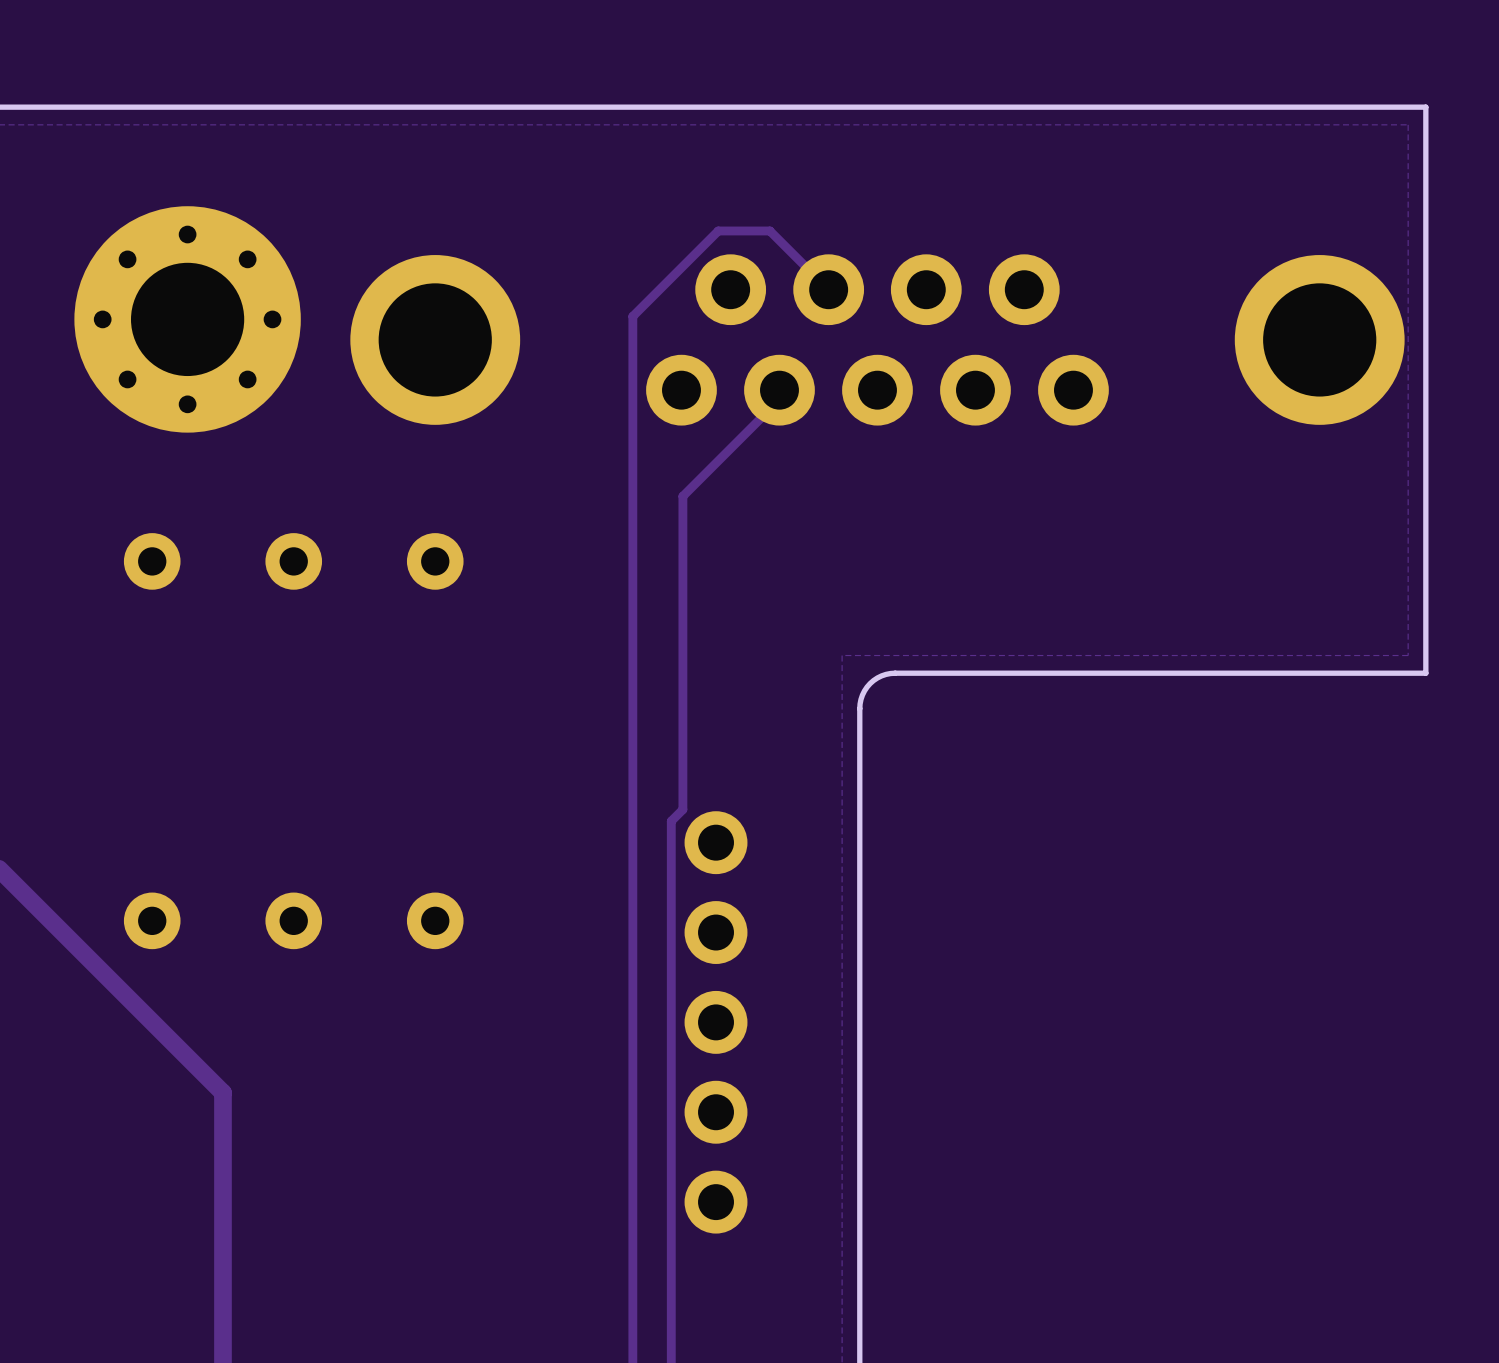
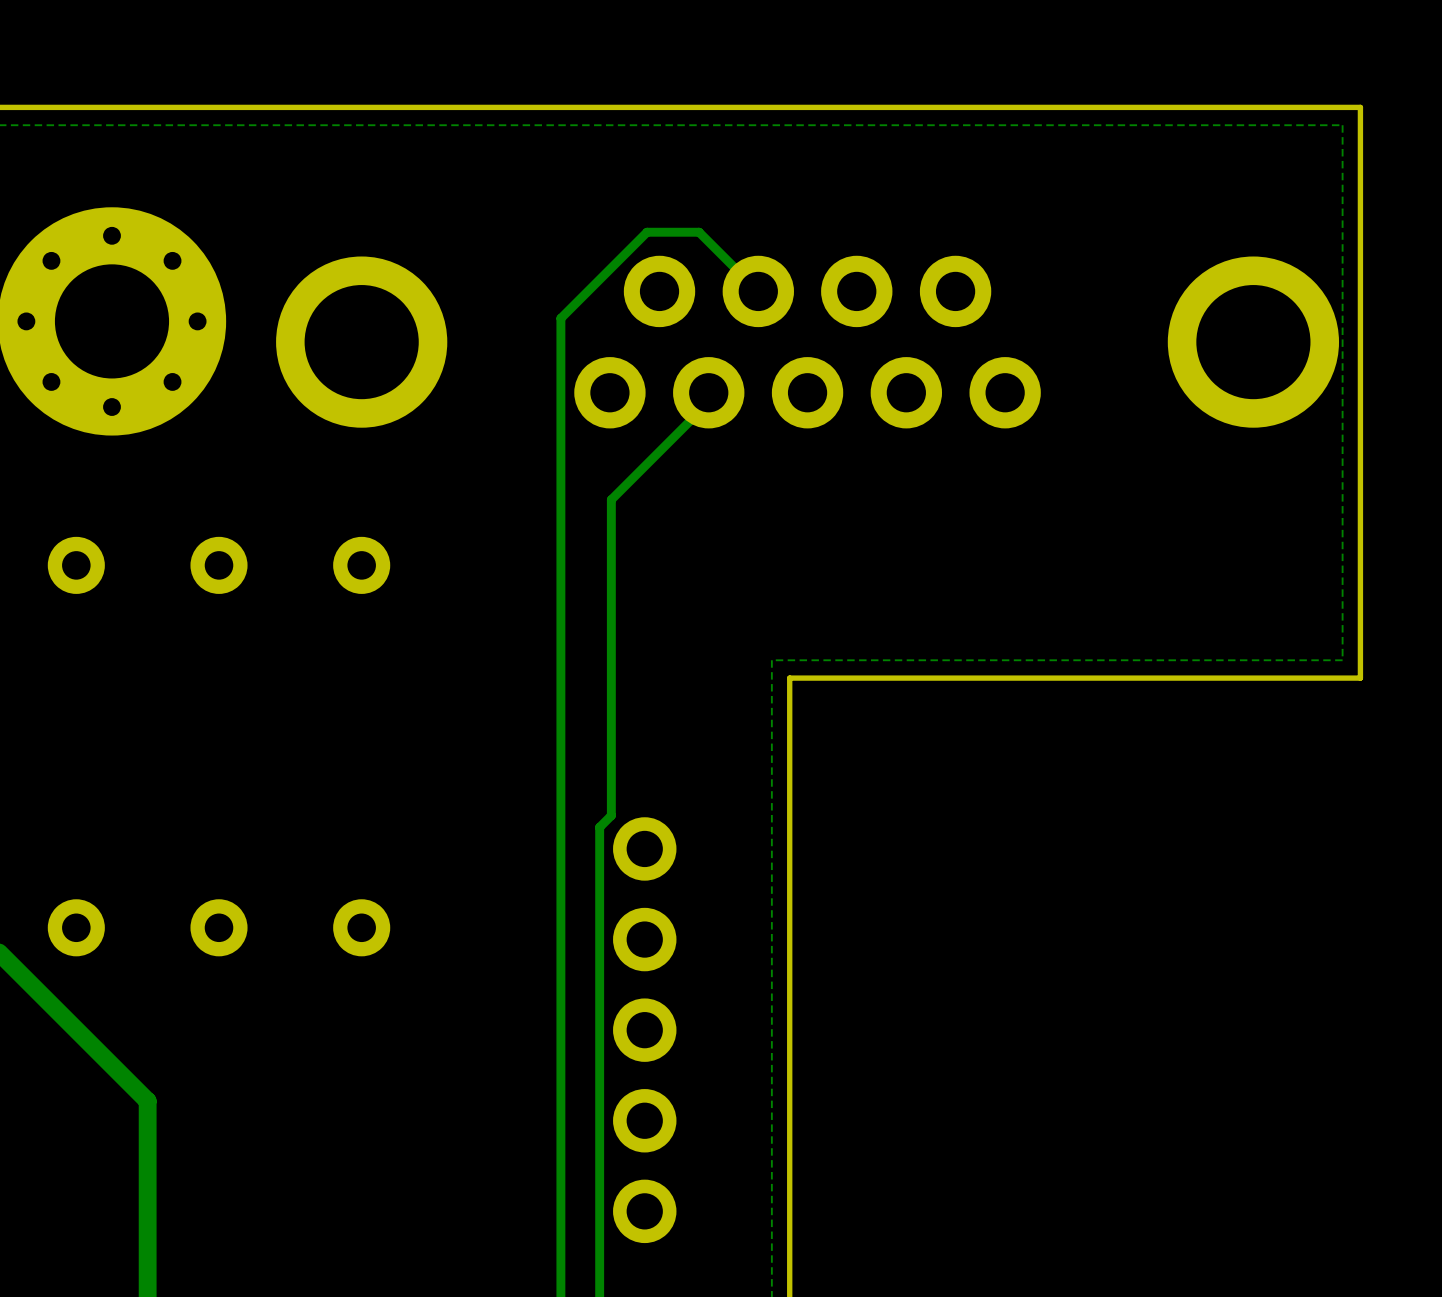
board edge: (895, 673) (881, 675) (870, 683) (862, 695) (859, 708) -> (825, 678) (789, 678) (789, 713)

